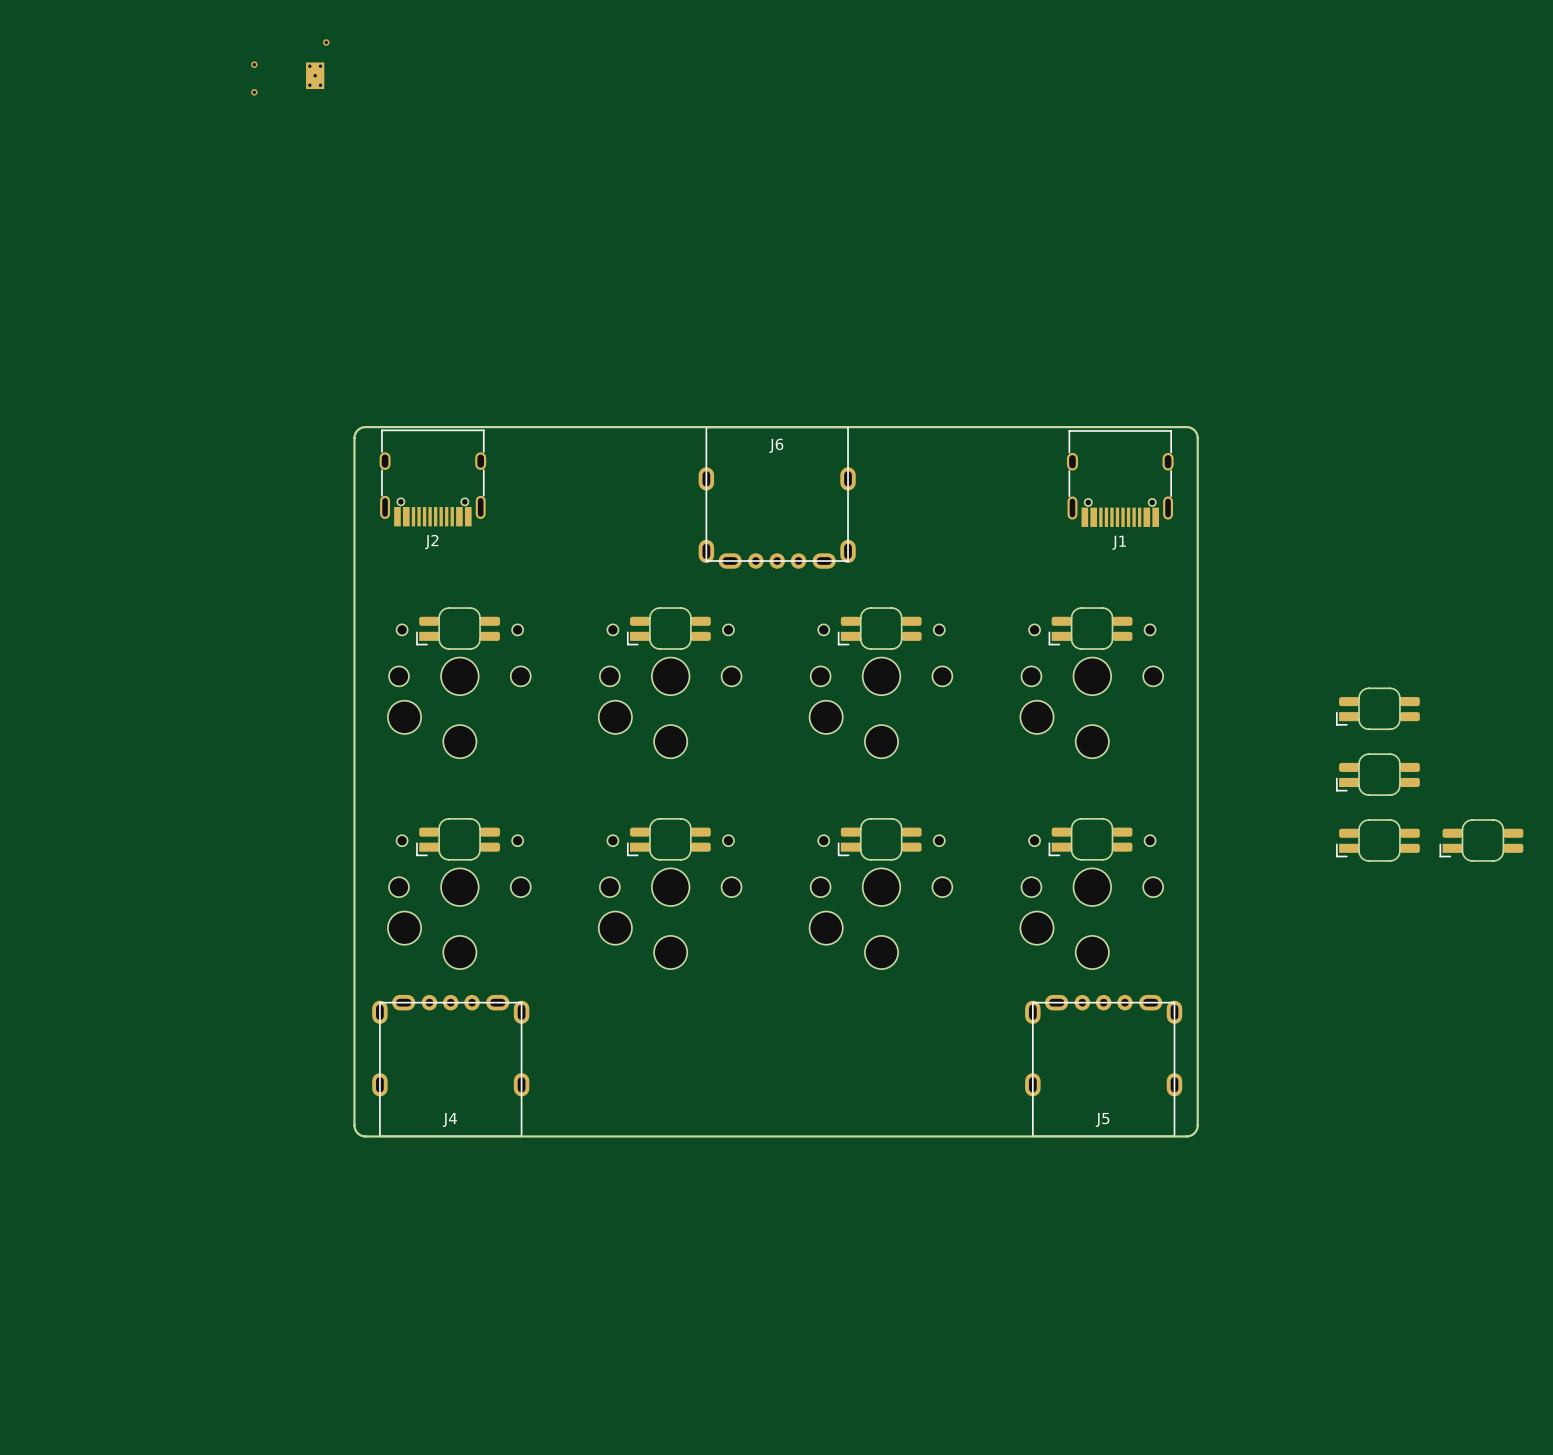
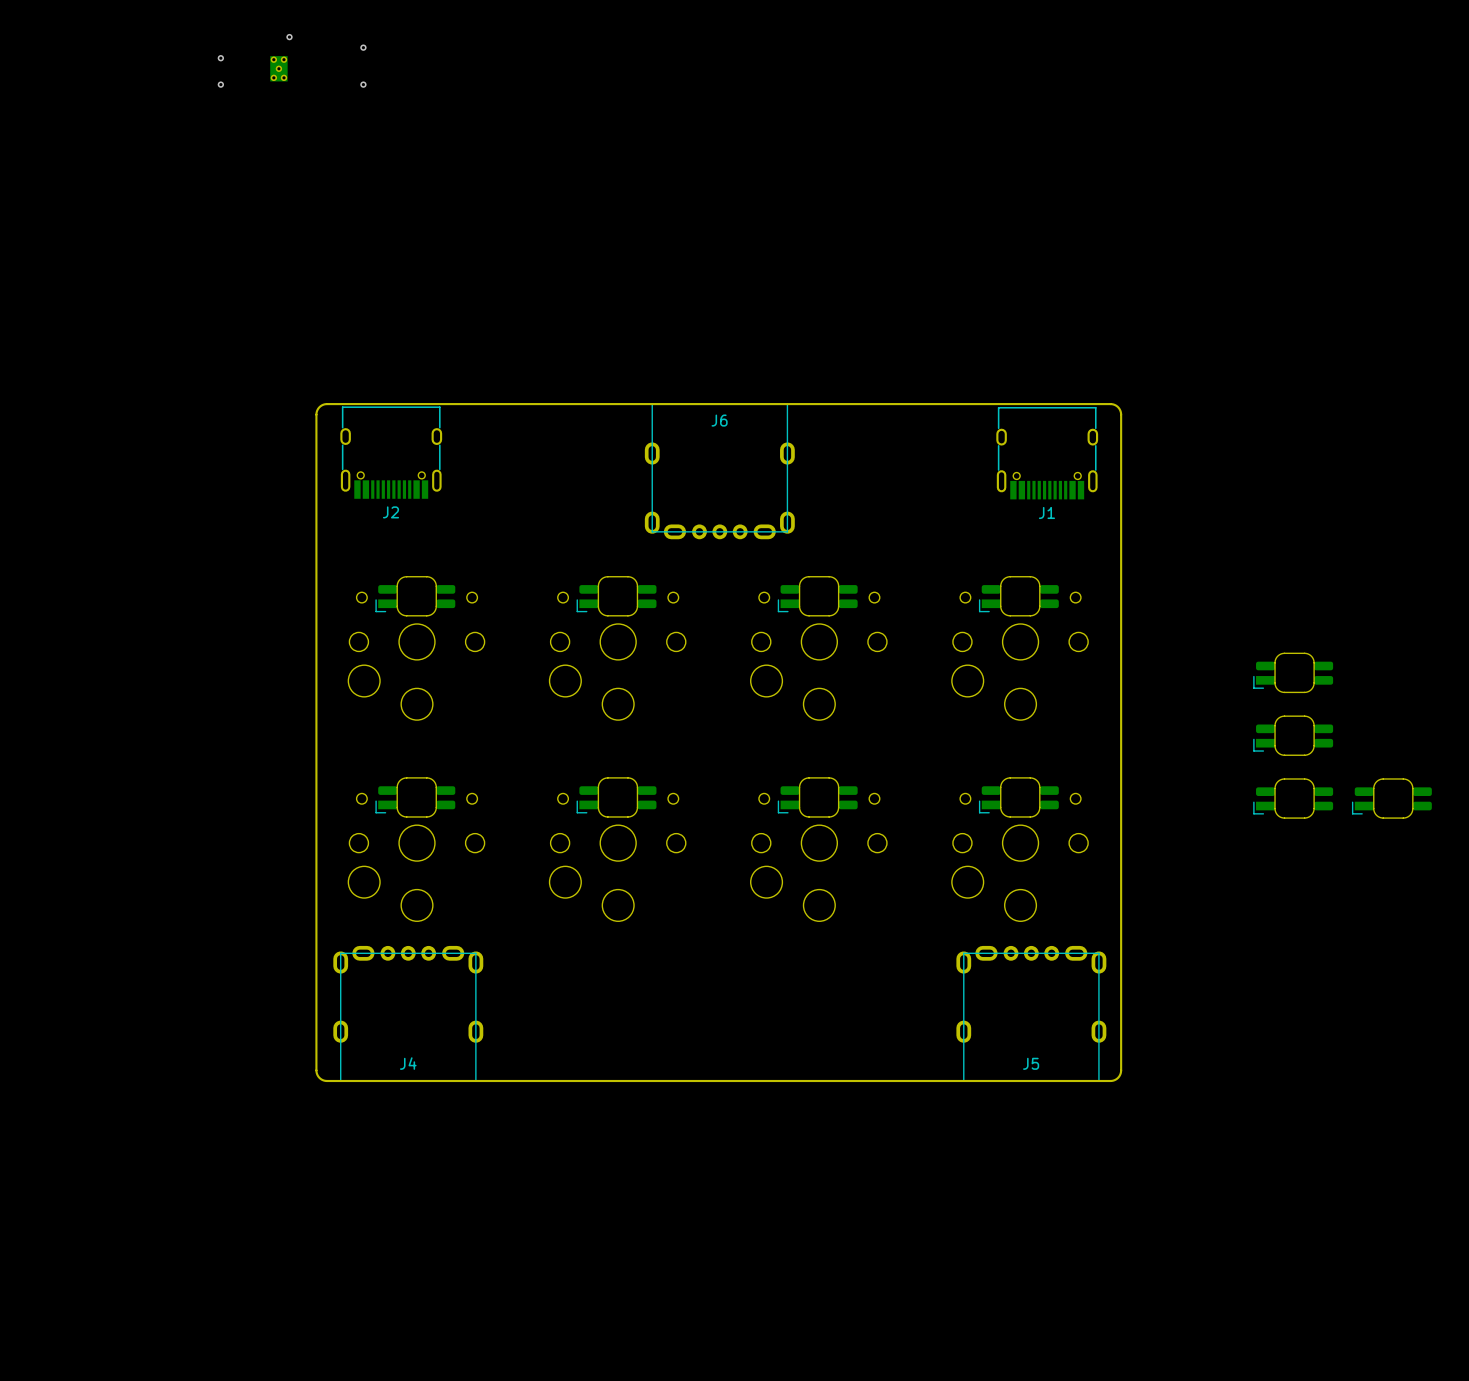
via: none -> (363, 47)
via: none -> (363, 84)

